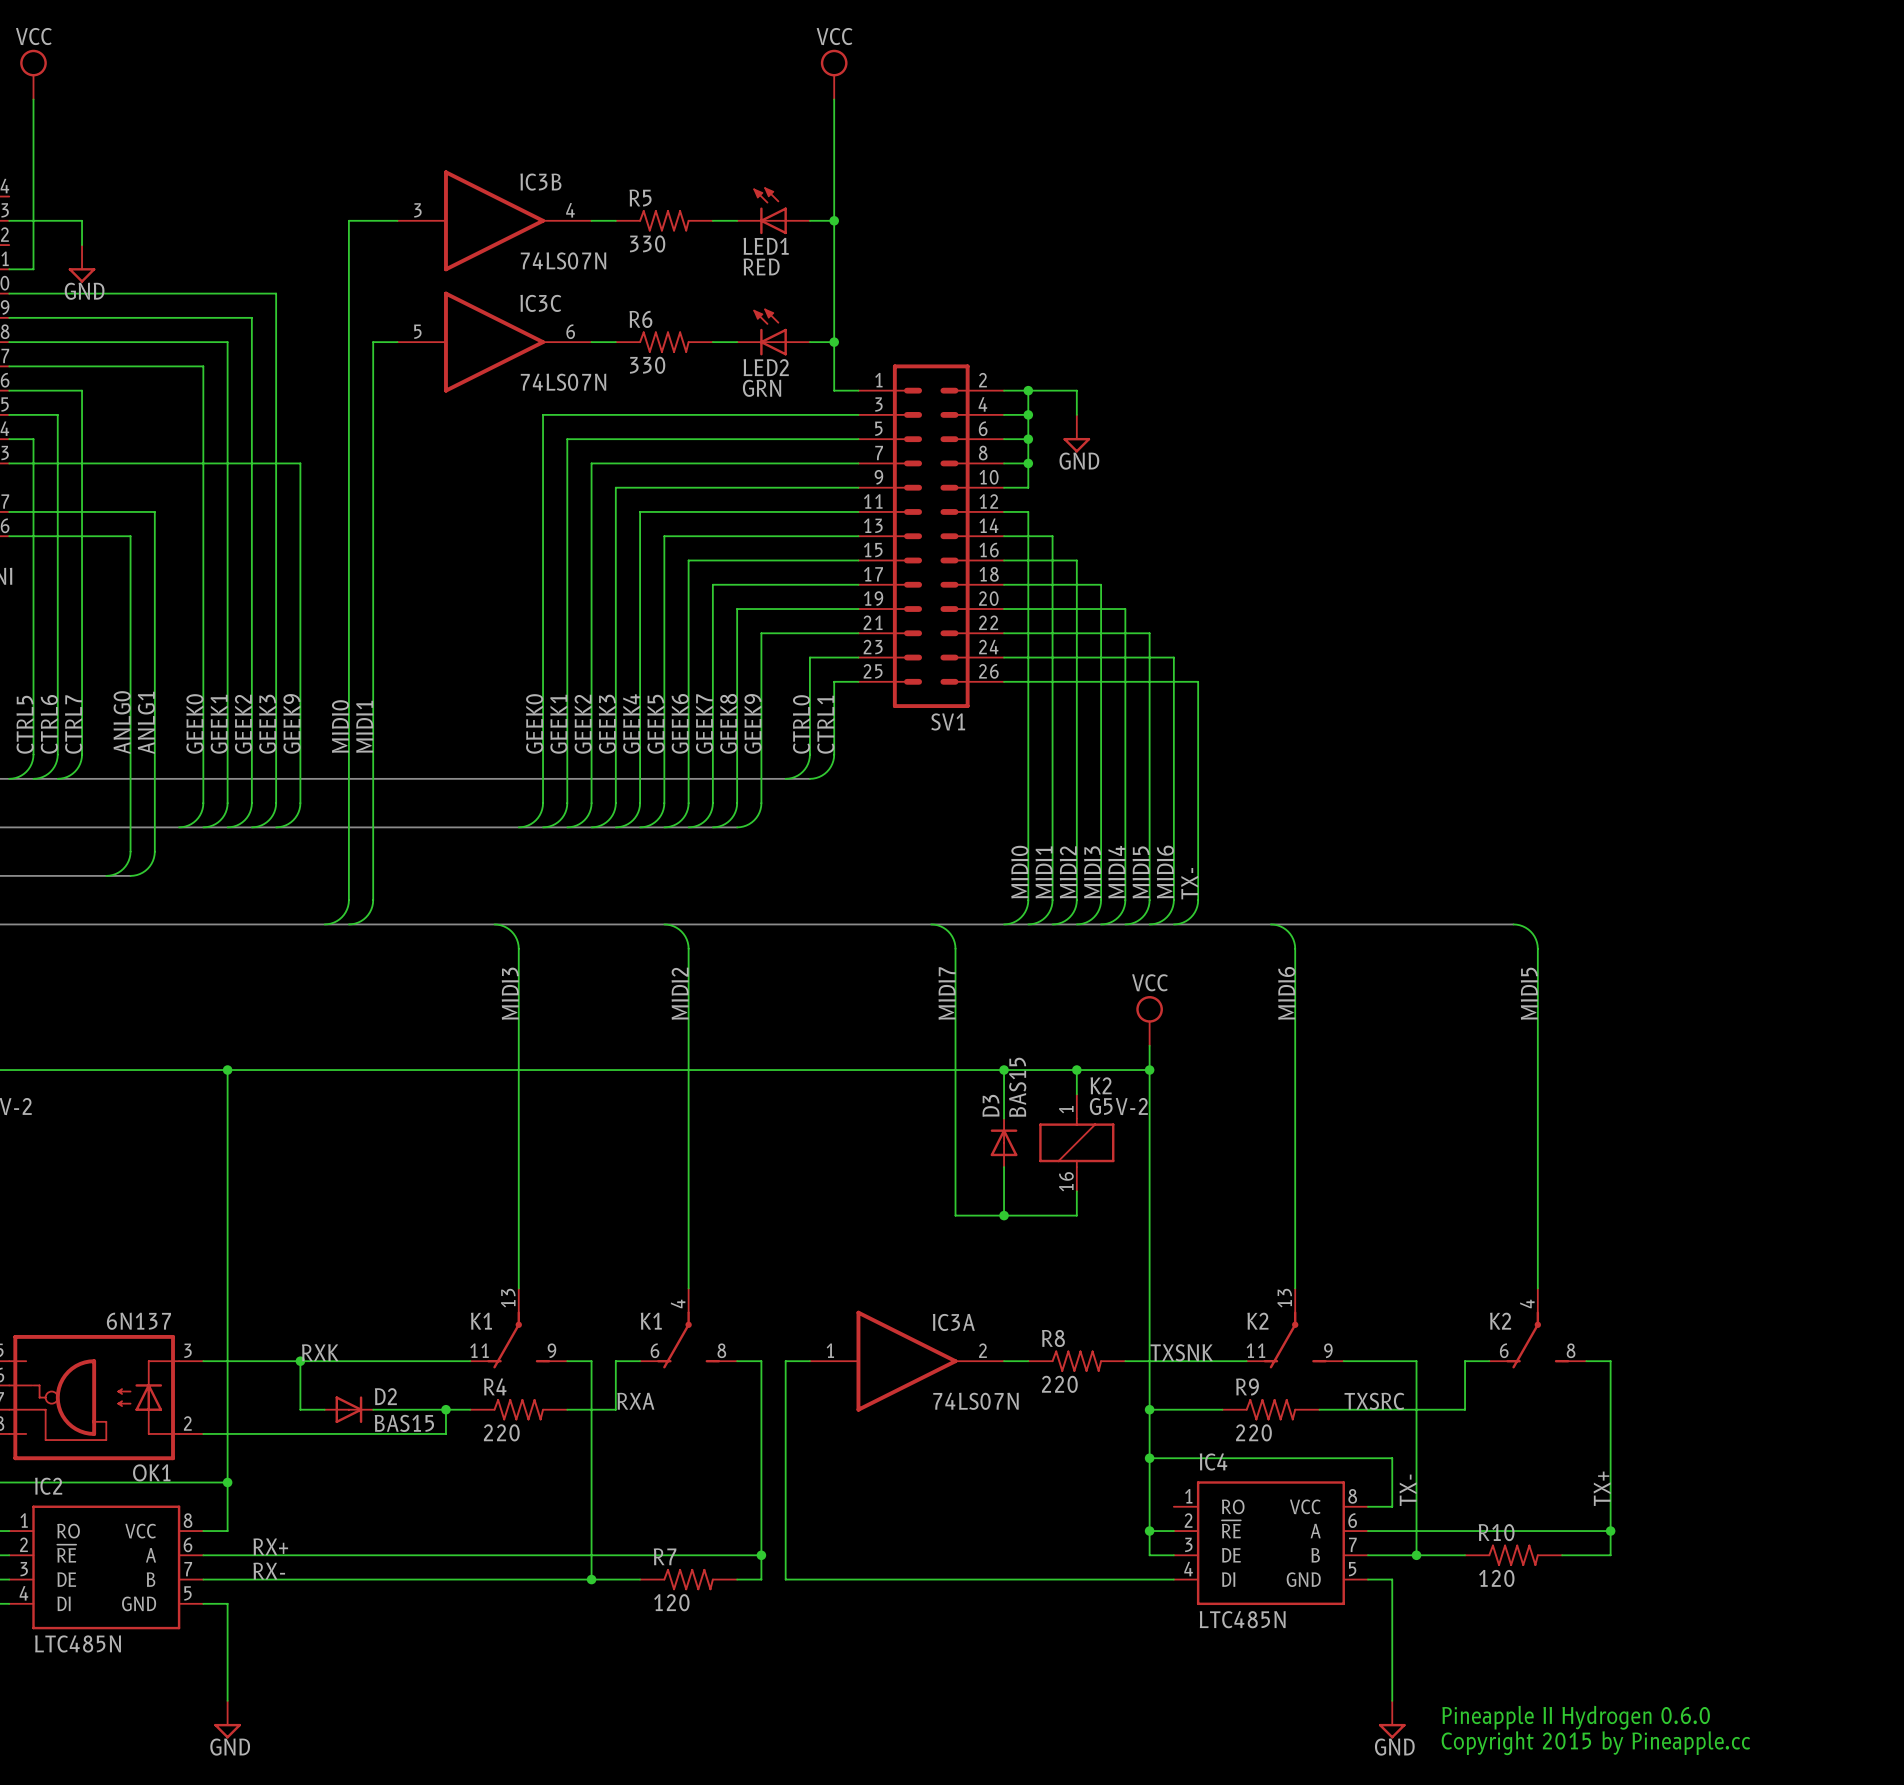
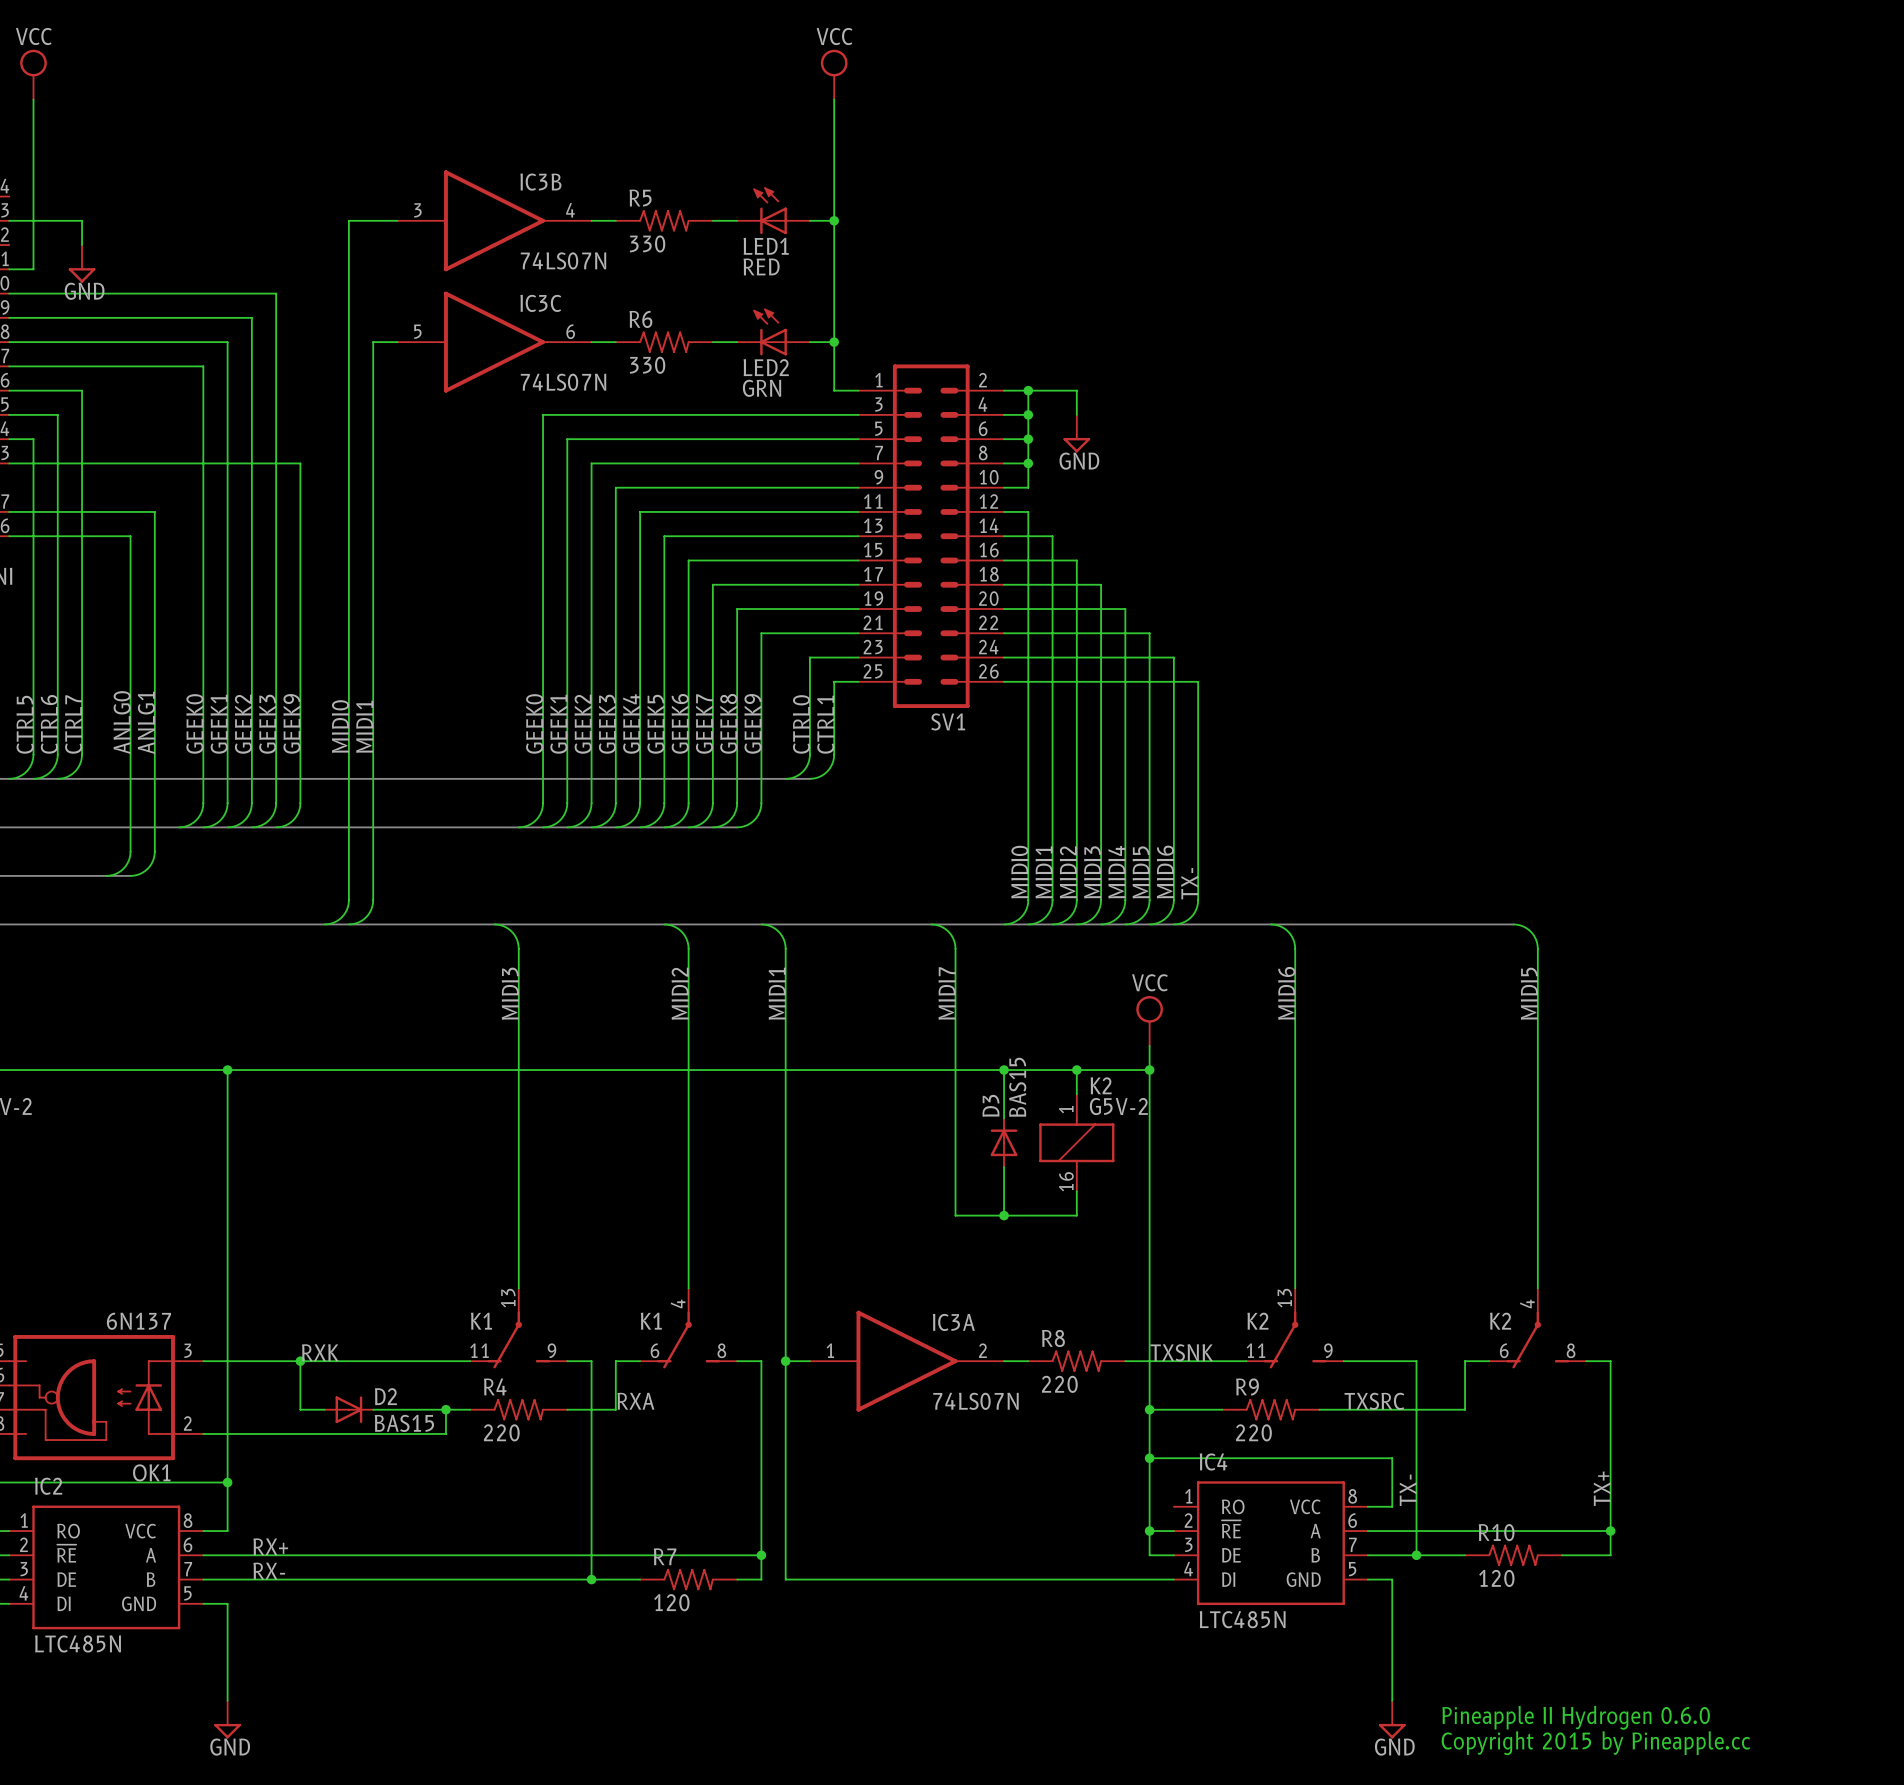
wire: none -> (761, 924) (770, 926) (778, 931) (783, 939) (785, 948) (785, 1361)
label: none -> MIDI1 (777, 993)
junction: none -> (785, 1361)

